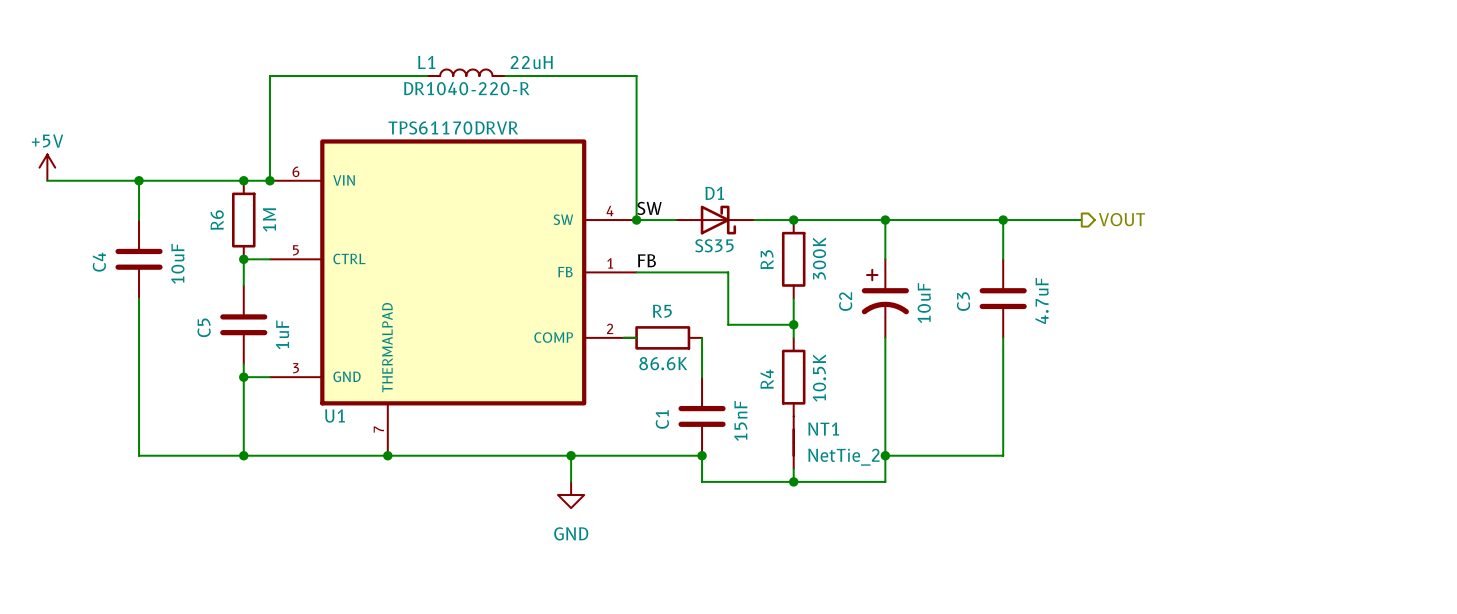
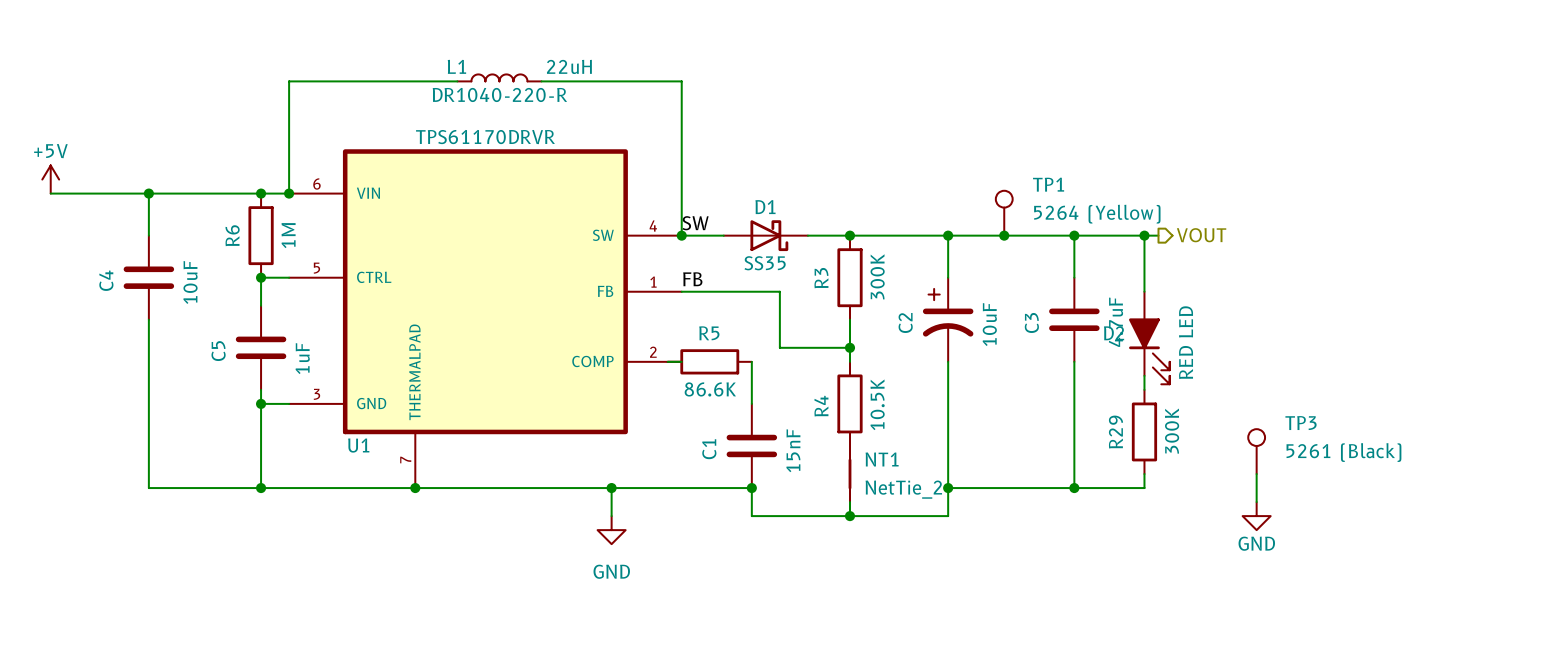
TP1: none -> 5264 (Yellow) (1004, 213)
junction: none -> (1004, 235)
wire: none -> (1144, 235) (1144, 291)
junction: none -> (1144, 235)
D2: none -> RED LED (1149, 338)
wire: none -> (1144, 375) (1144, 389)
R29: none -> 300K (1144, 431)
TP3: none -> 5261 (Black) (1256, 451)
wire: none -> (1144, 474) (1144, 488) (1074, 488)
wire: none -> (1256, 474) (1256, 502)
junction: none -> (1074, 488)
power symbol: none -> GND (1256, 516)

